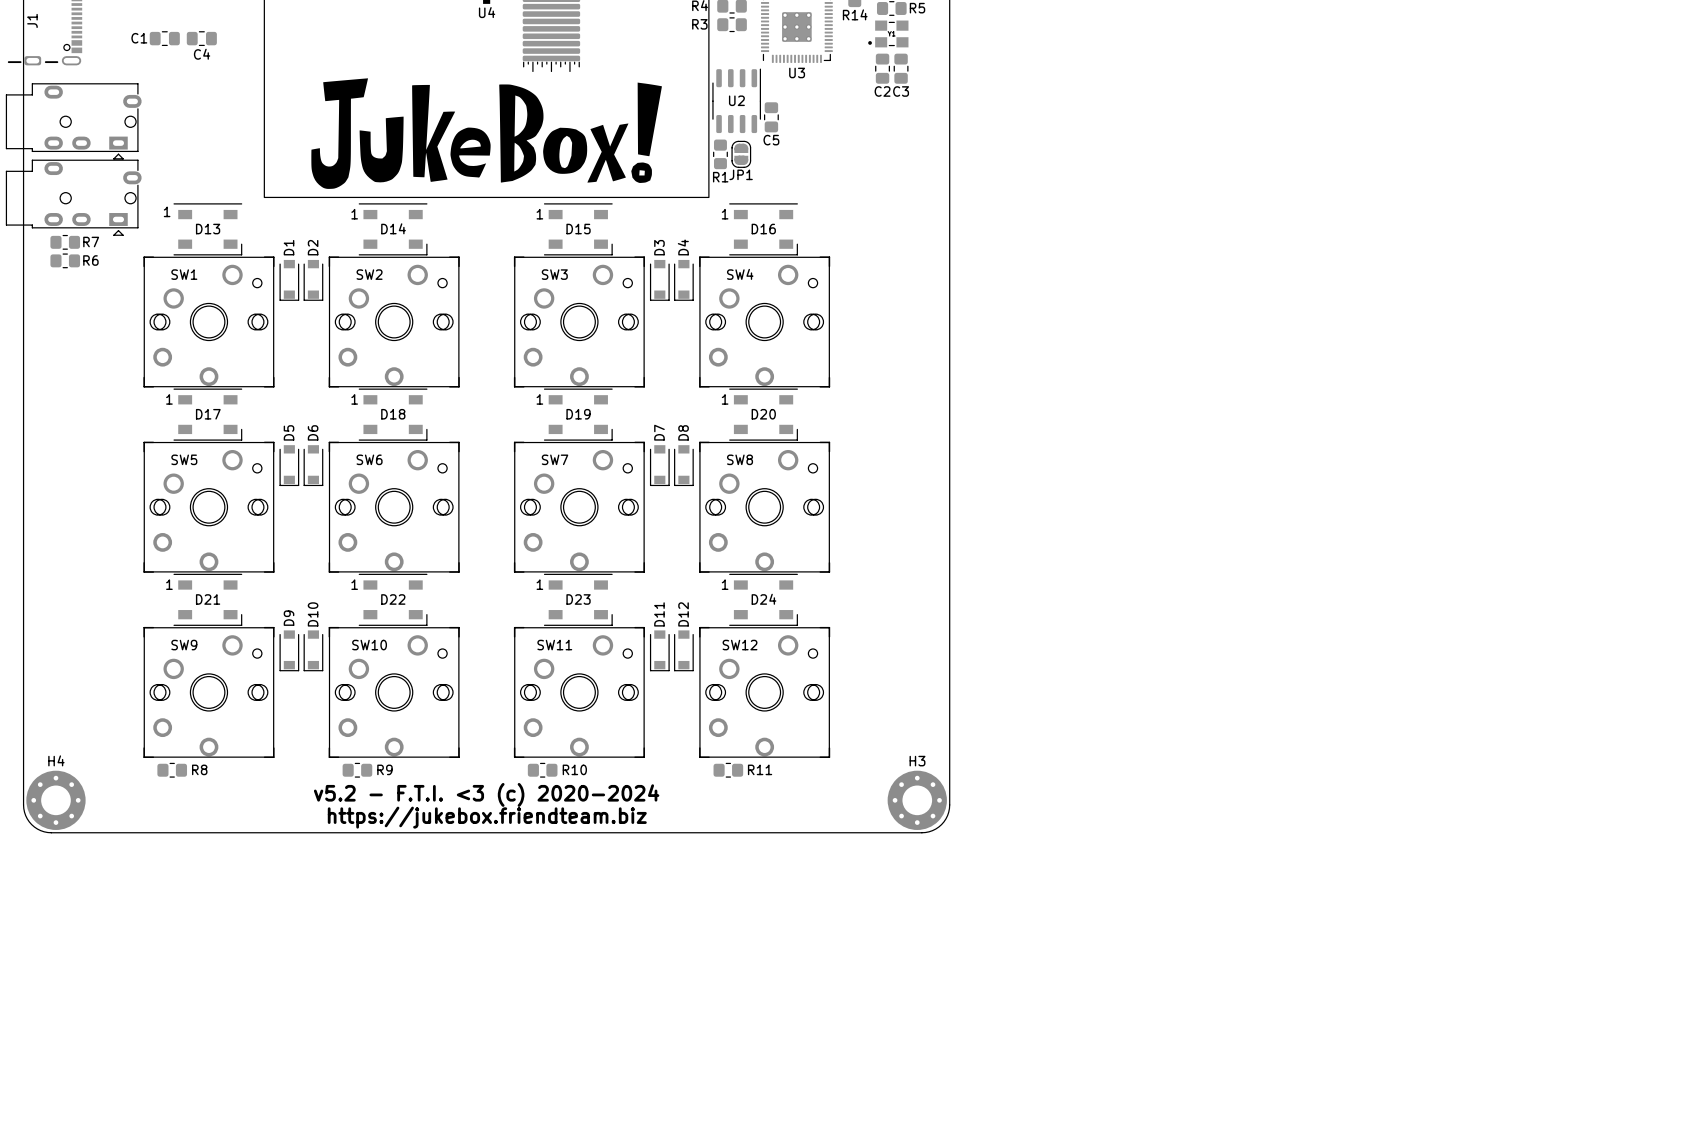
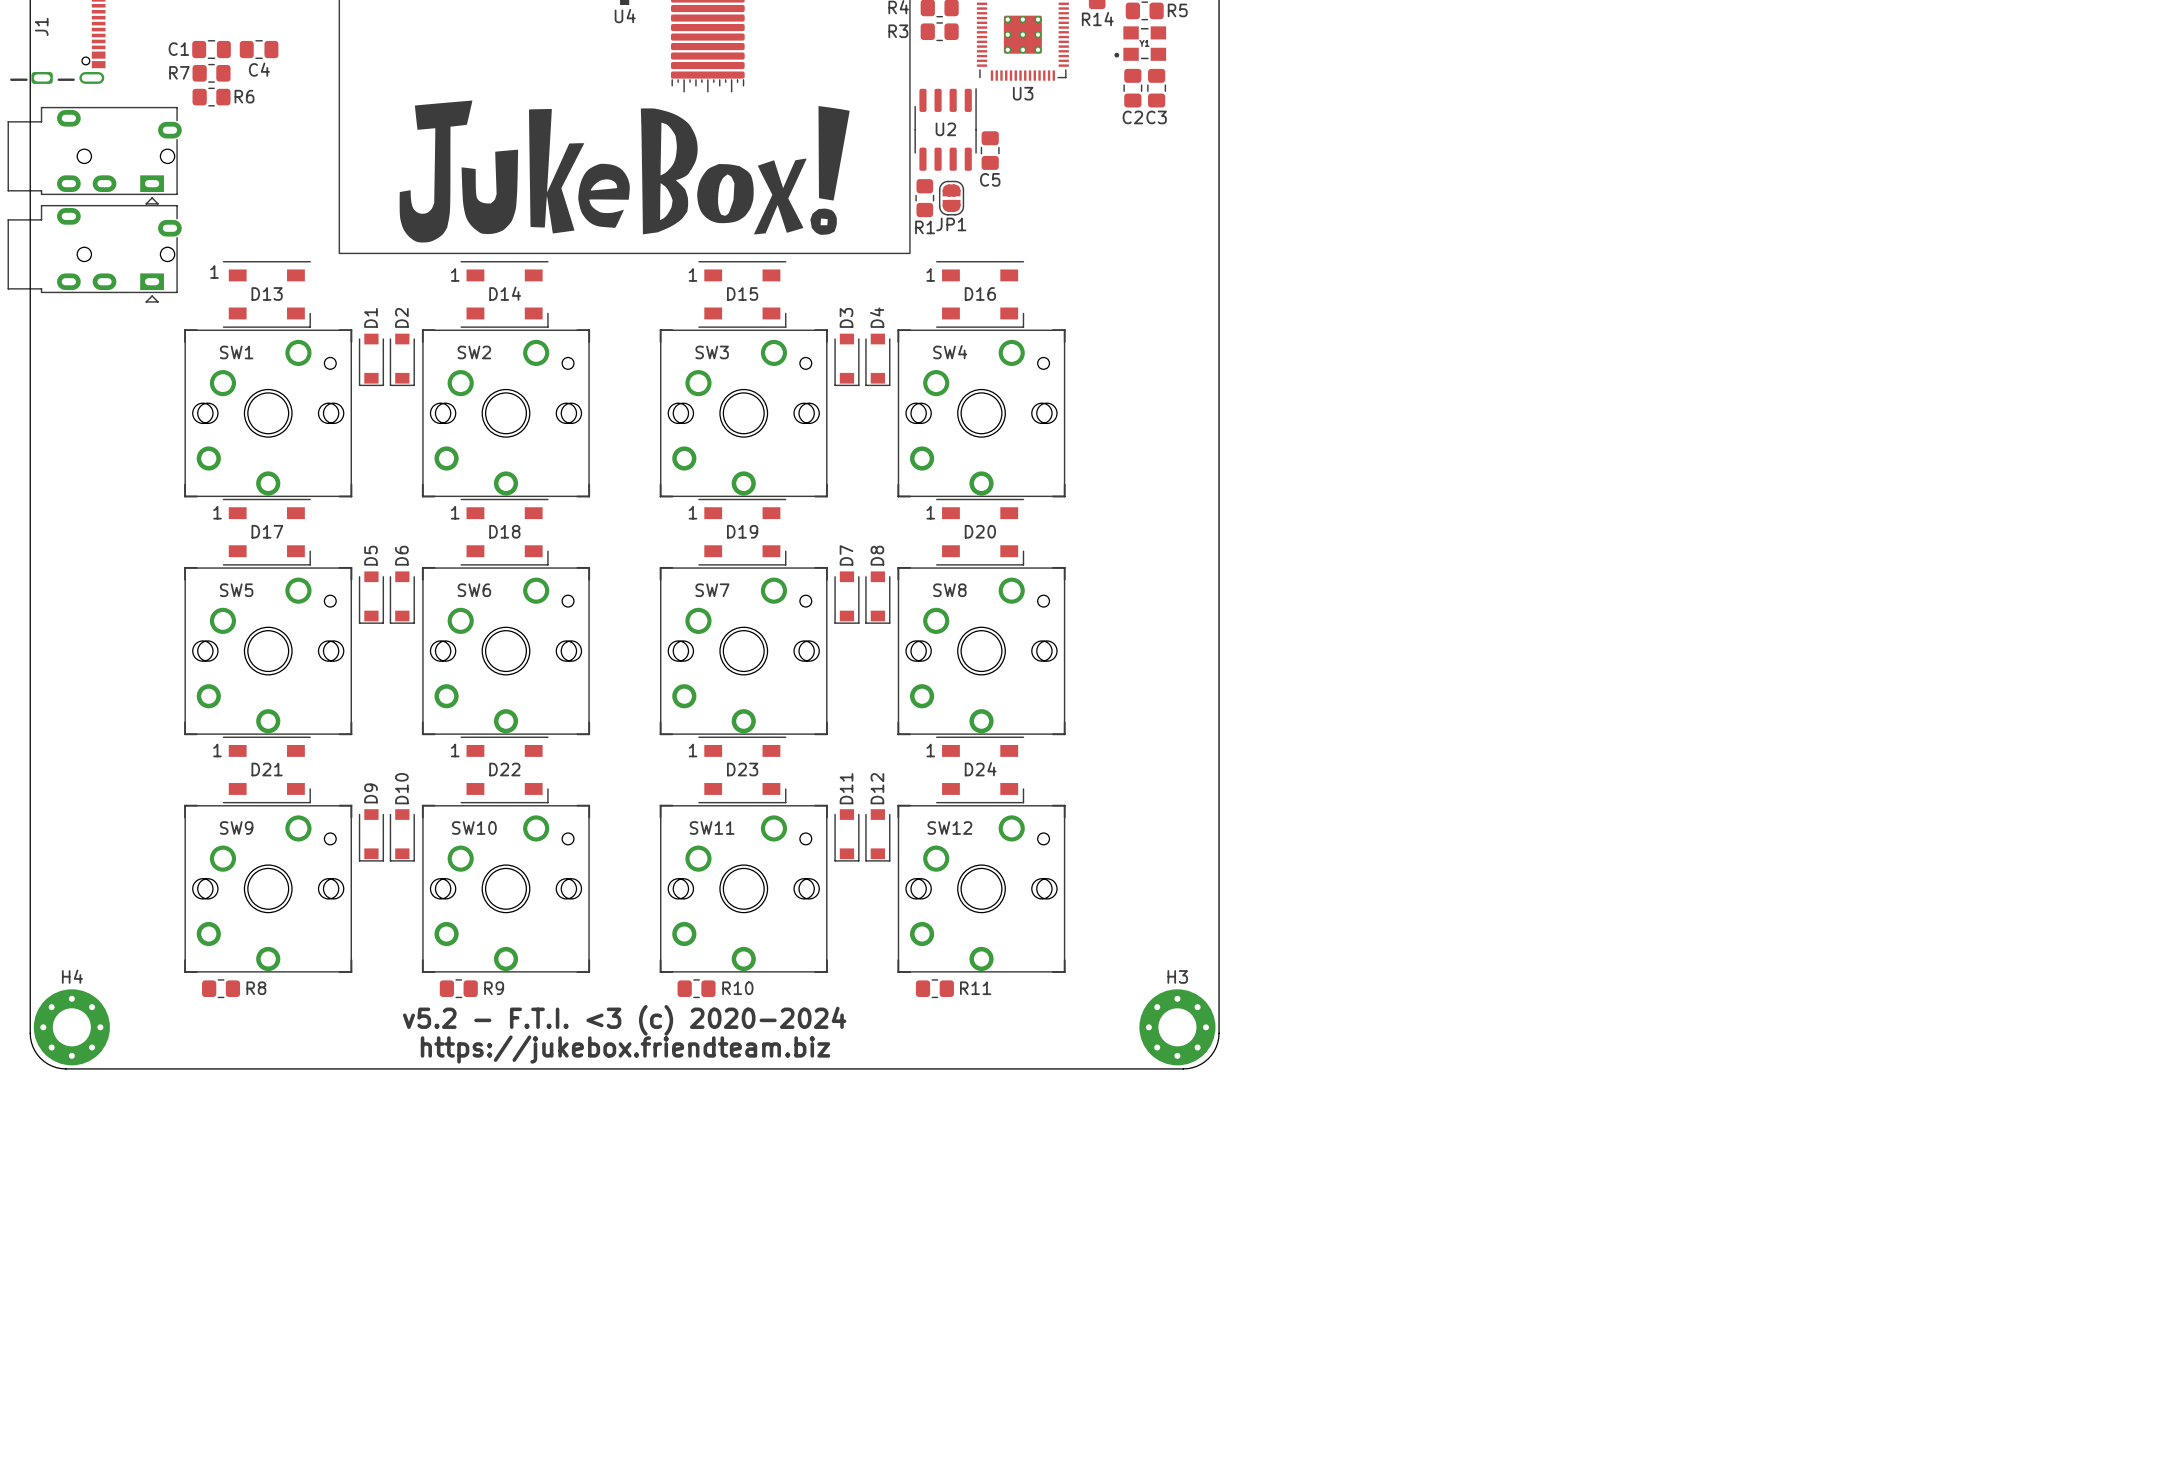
R7 position: (65, 242) -> (211, 73)
R7 name position: R7 (91, 242) -> R7 (179, 72)
R6 position: (65, 260) -> (211, 97)

